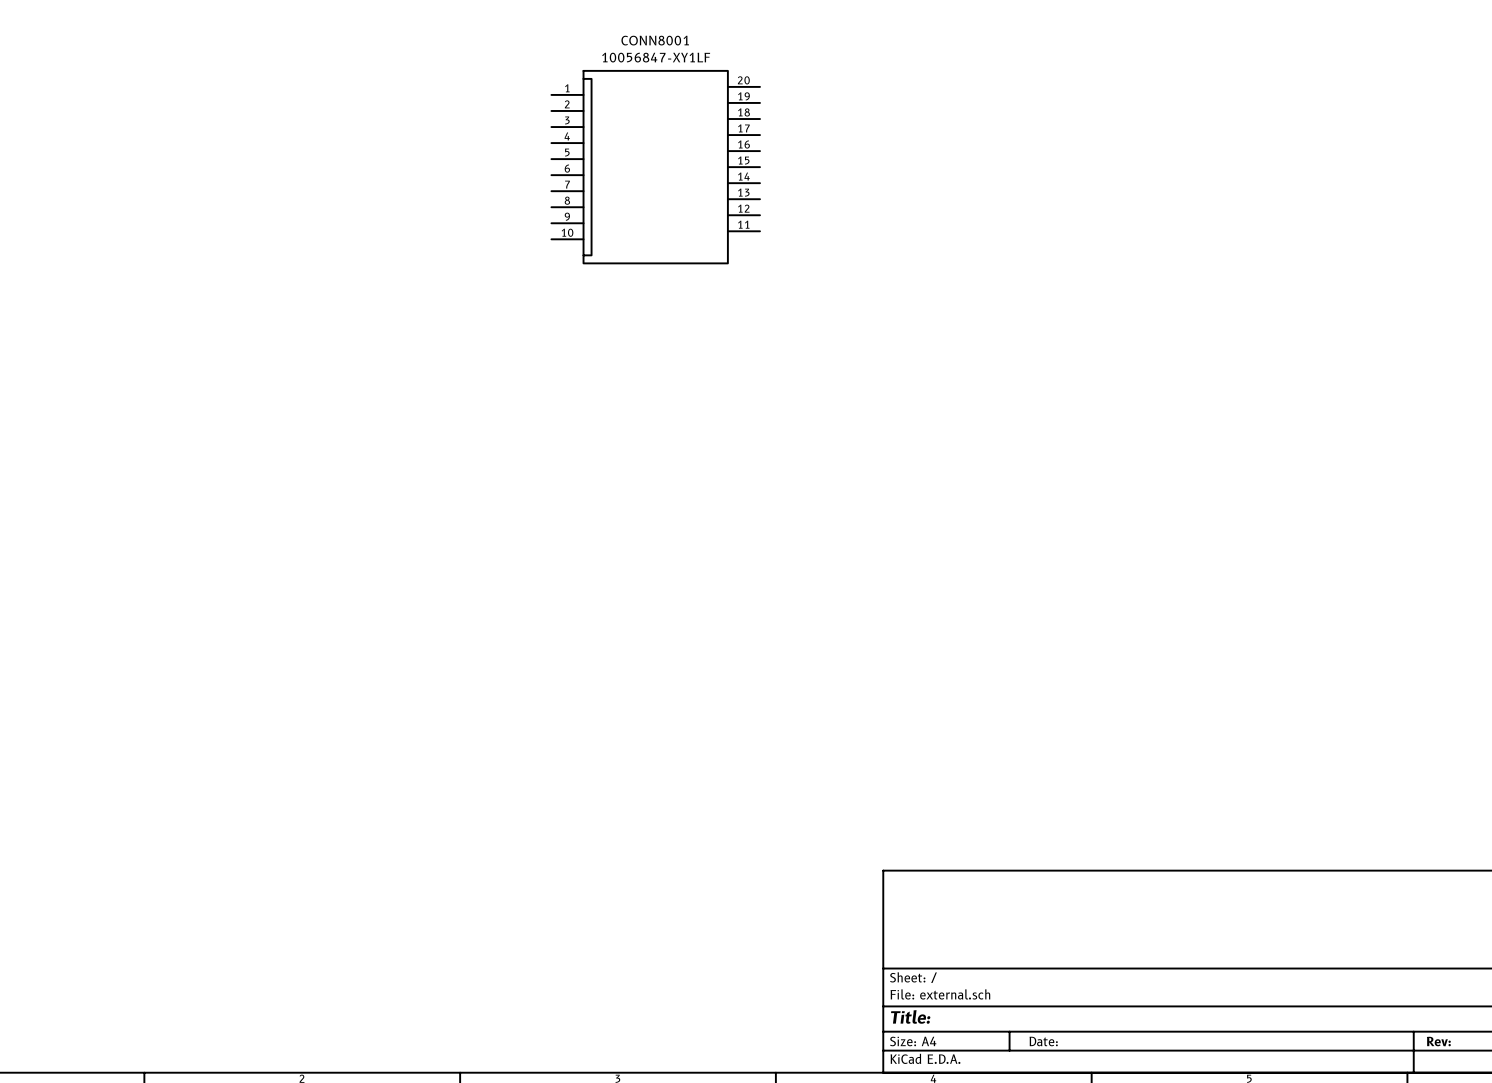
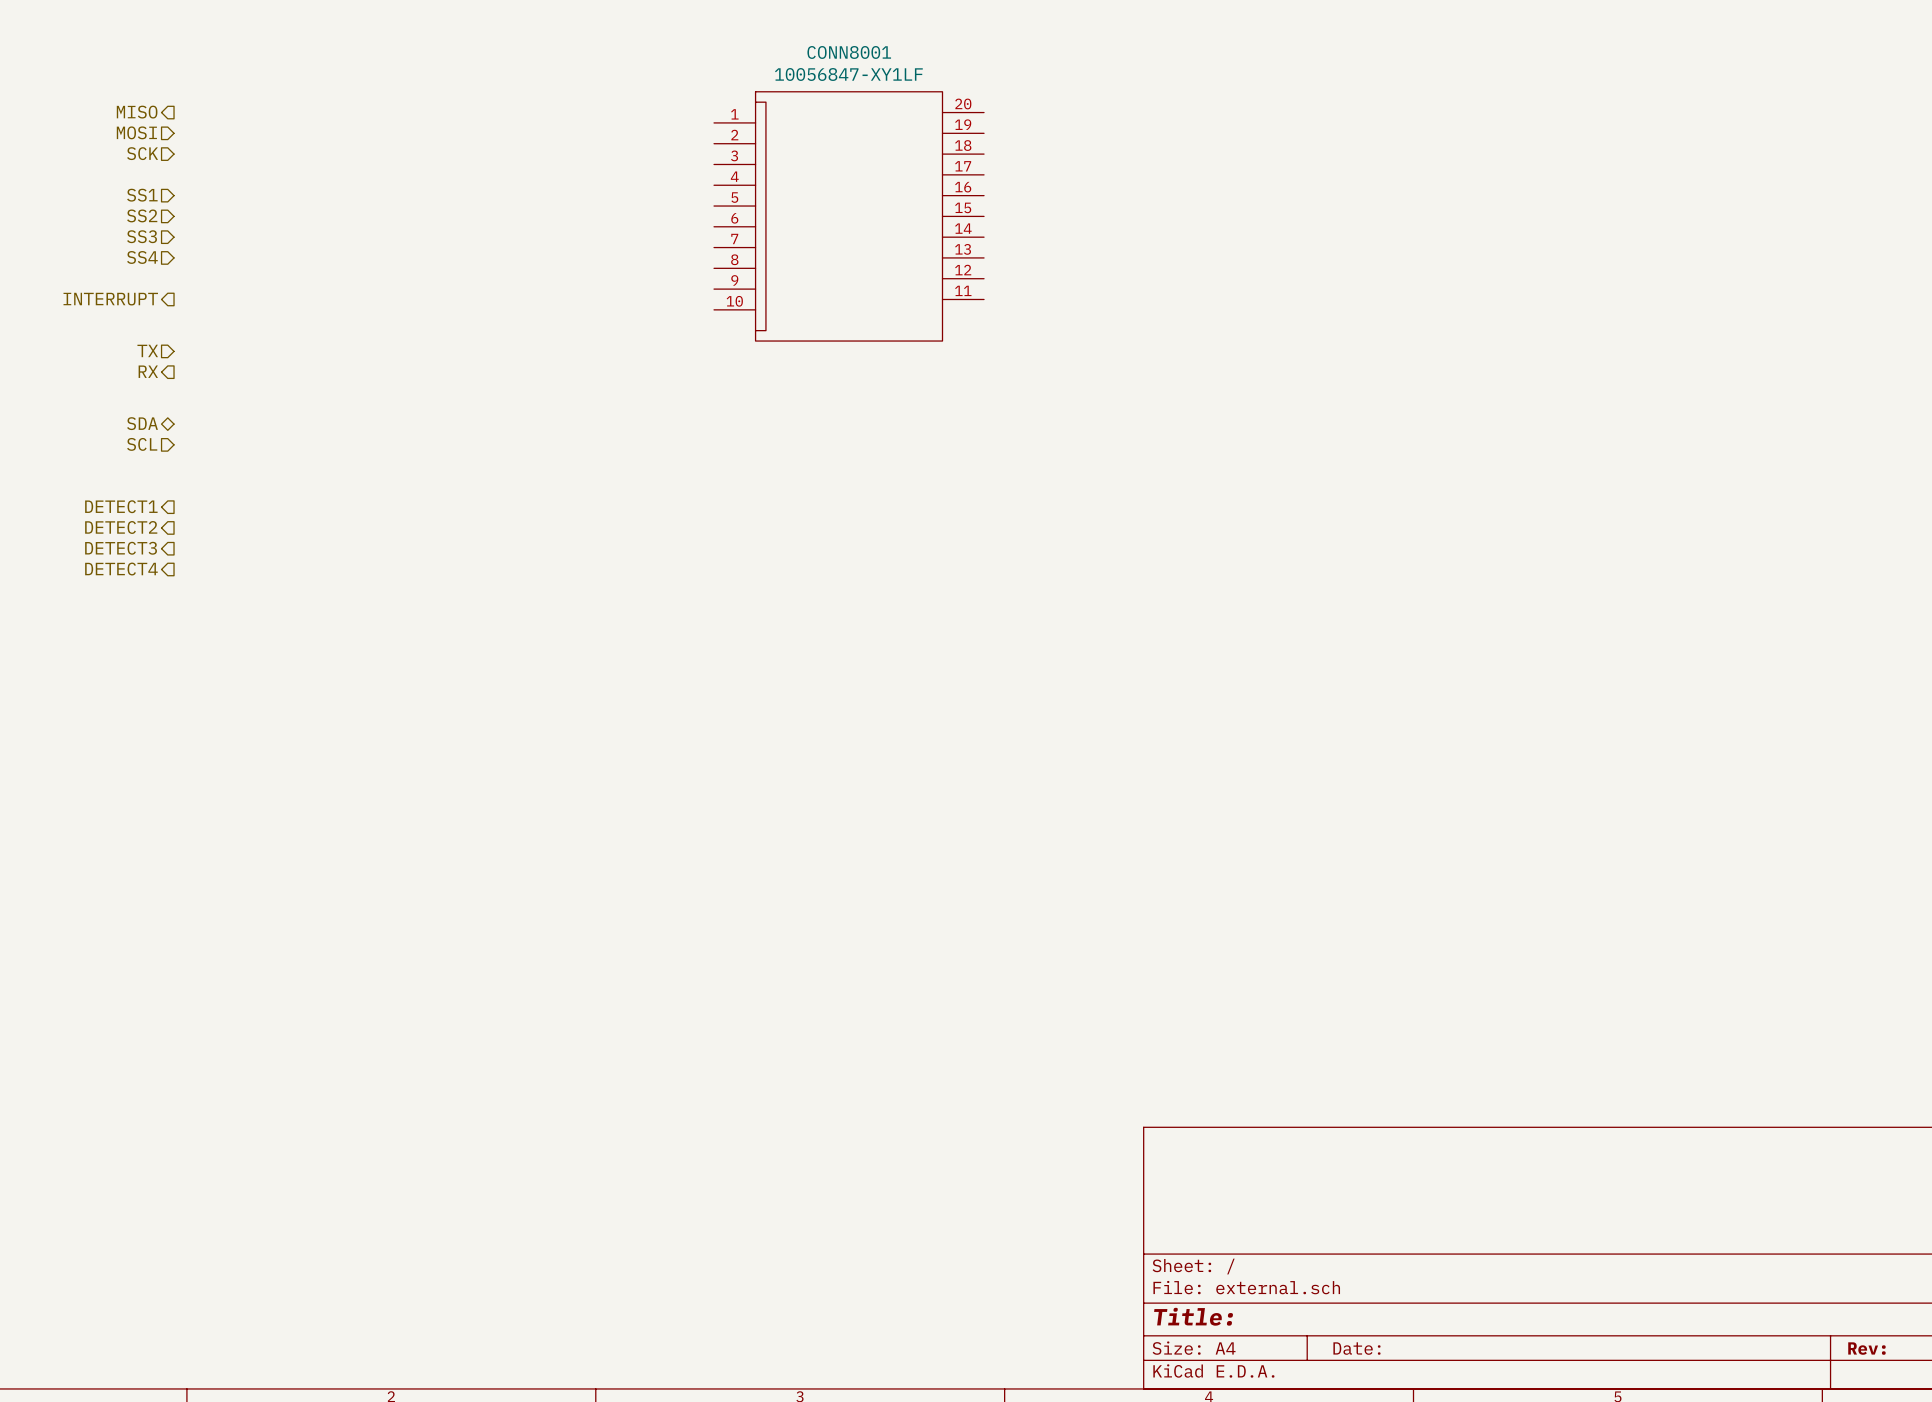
hierarchical label: none -> MISO (137, 112)
hierarchical label: none -> MOSI (136, 132)
hierarchical label: none -> SCK (142, 153)
hierarchical label: none -> SS1 (142, 195)
hierarchical label: none -> SS2 (142, 215)
hierarchical label: none -> SS3 (142, 236)
hierarchical label: none -> SS4 (142, 257)
hierarchical label: none -> INTERRUPT (110, 299)
hierarchical label: none -> TX (147, 350)
hierarchical label: none -> RX (148, 371)
hierarchical label: none -> SDA (142, 423)
hierarchical label: none -> SCL (142, 444)
hierarchical label: none -> DETECT1 (121, 506)
hierarchical label: none -> DETECT2 (121, 527)
hierarchical label: none -> DETECT3 (121, 548)
hierarchical label: none -> DETECT4 (121, 569)

